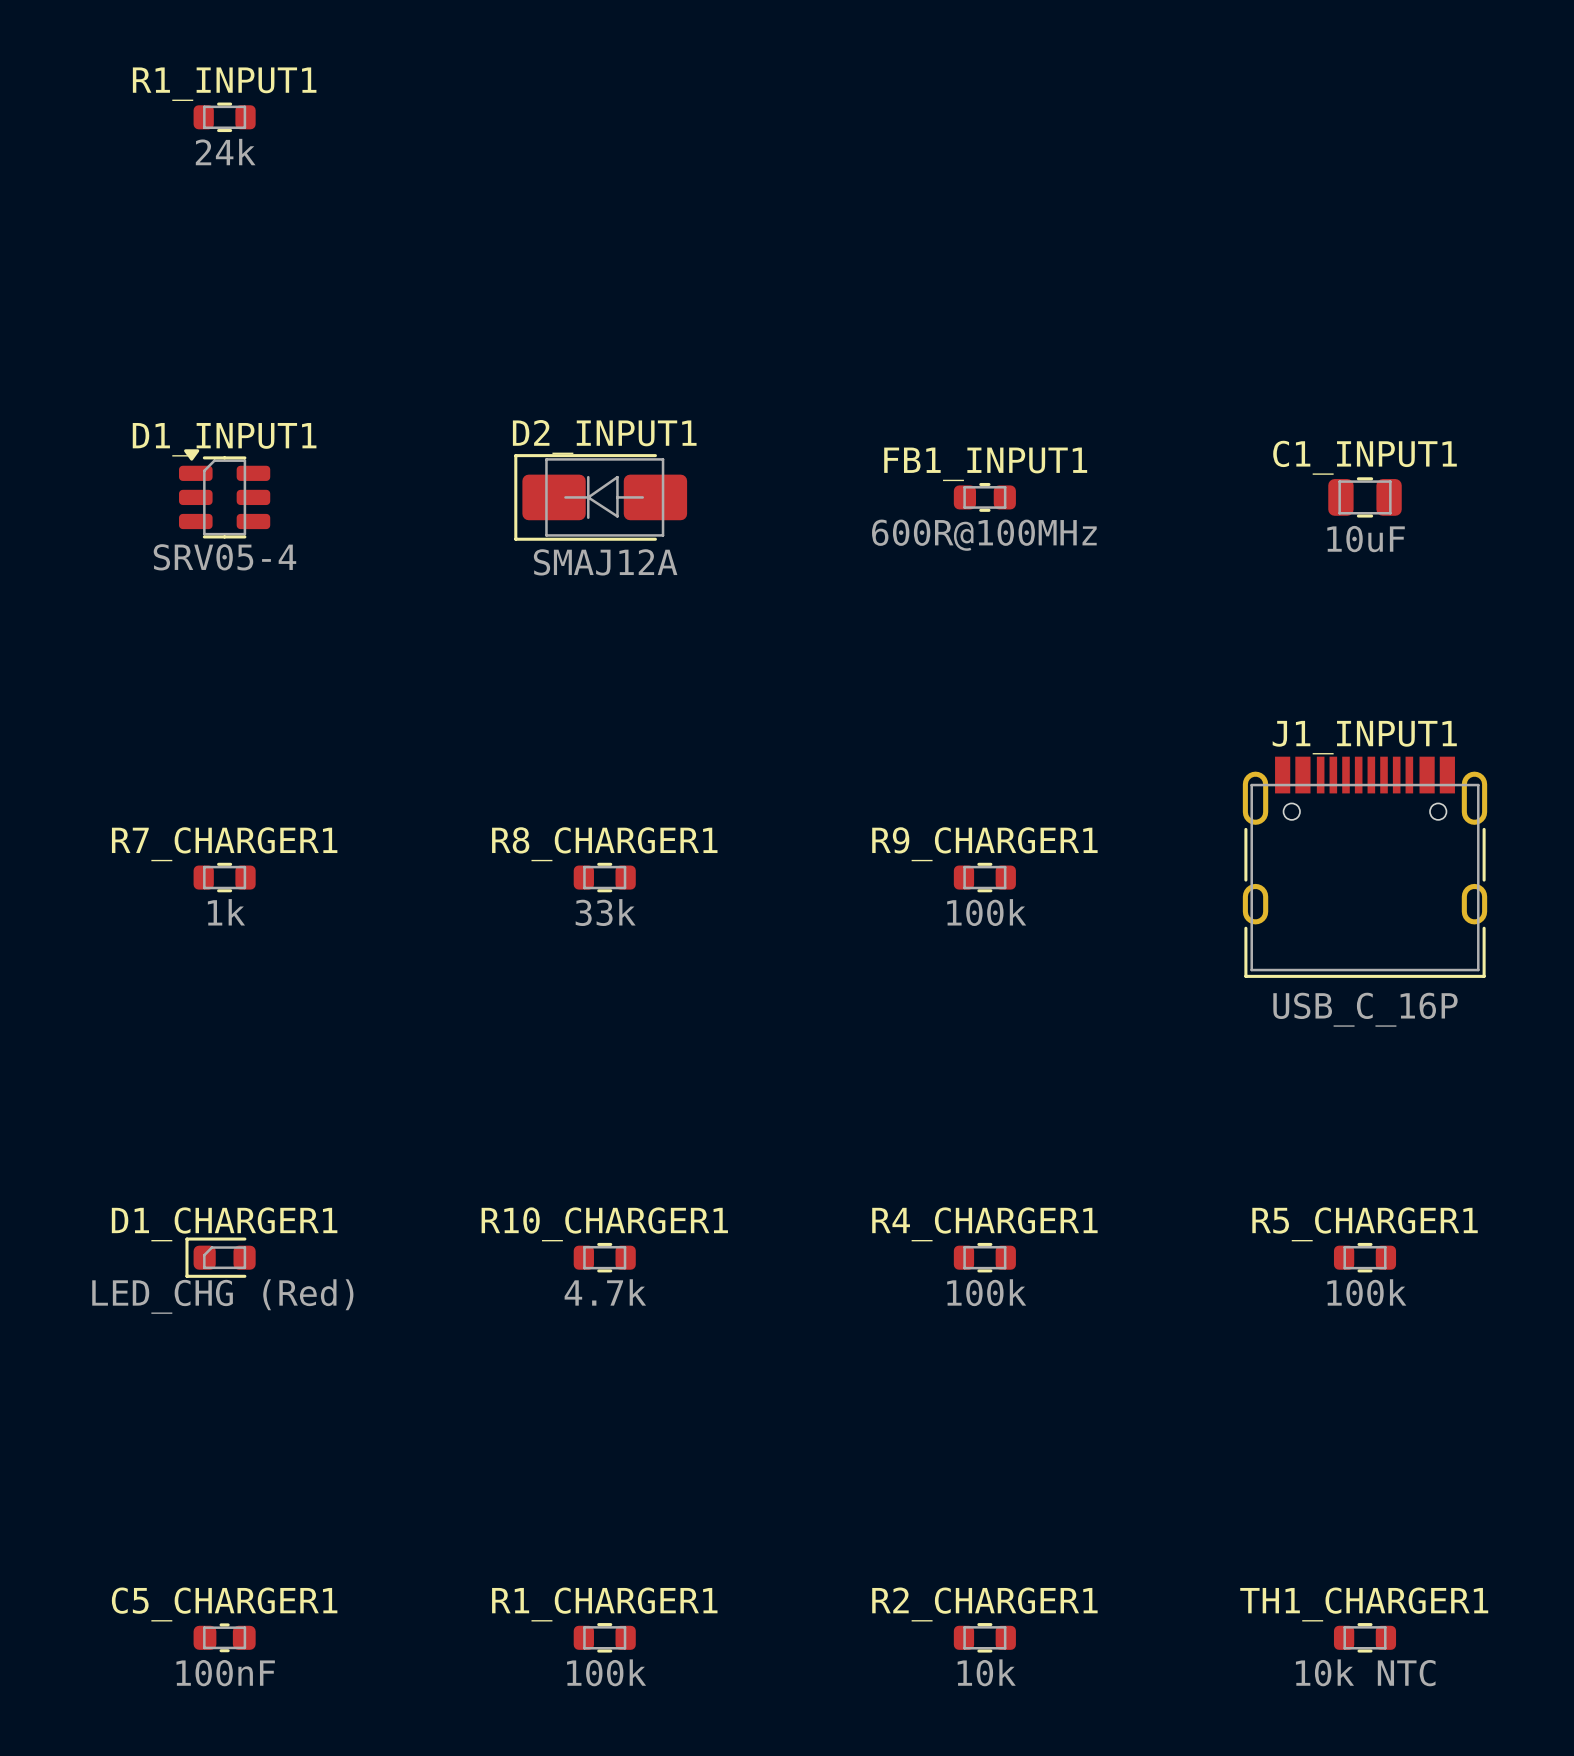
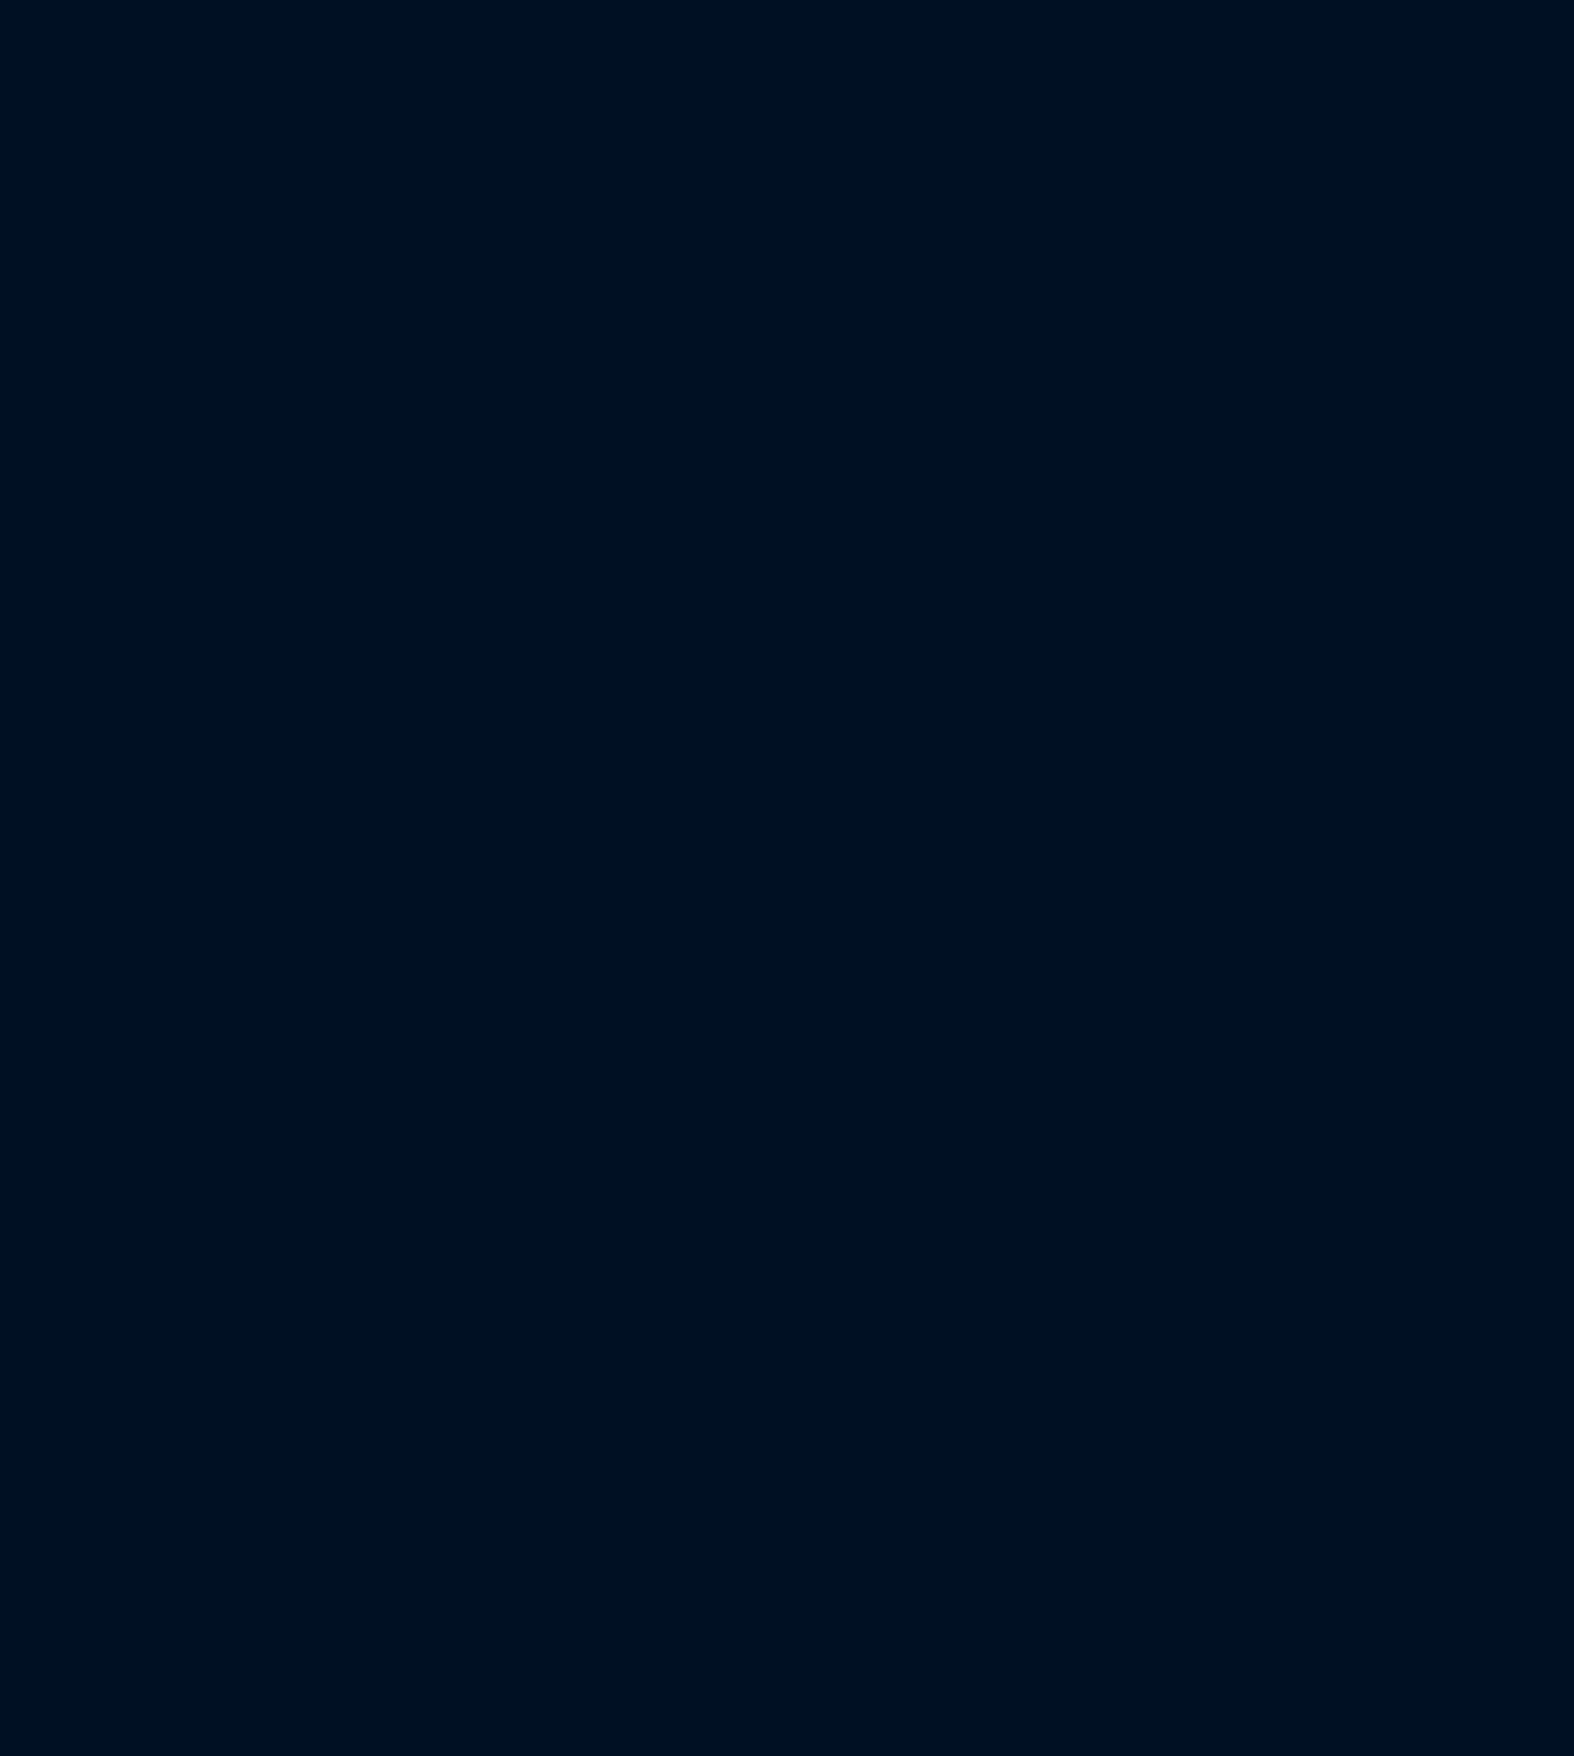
R1_INPUT1: 24k (224, 117) -> none
D1_INPUT1: SRV05-4 (224, 493) -> none
D2_INPUT1: SMAJ12A (600, 497) -> none
FB1_INPUT1: 600R@100MHz (984, 497) -> none
C1_INPUT1: 10uF (1365, 497) -> none
J1_INPUT1: USB_C_16P (1365, 867) -> none
R7_CHARGER1: 1k (224, 877) -> none
R8_CHARGER1: 33k (604, 877) -> none
R9_CHARGER1: 100k (984, 877) -> none
D1_CHARGER1: LED_CHG (Red) (220, 1257) -> none
R10_CHARGER1: 4.7k (604, 1257) -> none
R4_CHARGER1: 100k (984, 1257) -> none
R5_CHARGER1: 100k (1365, 1257) -> none
C5_CHARGER1: 100nF (224, 1637) -> none
R1_CHARGER1: 100k (604, 1637) -> none
R2_CHARGER1: 10k (984, 1637) -> none
TH1_CHARGER1: 10k NTC (1365, 1637) -> none

